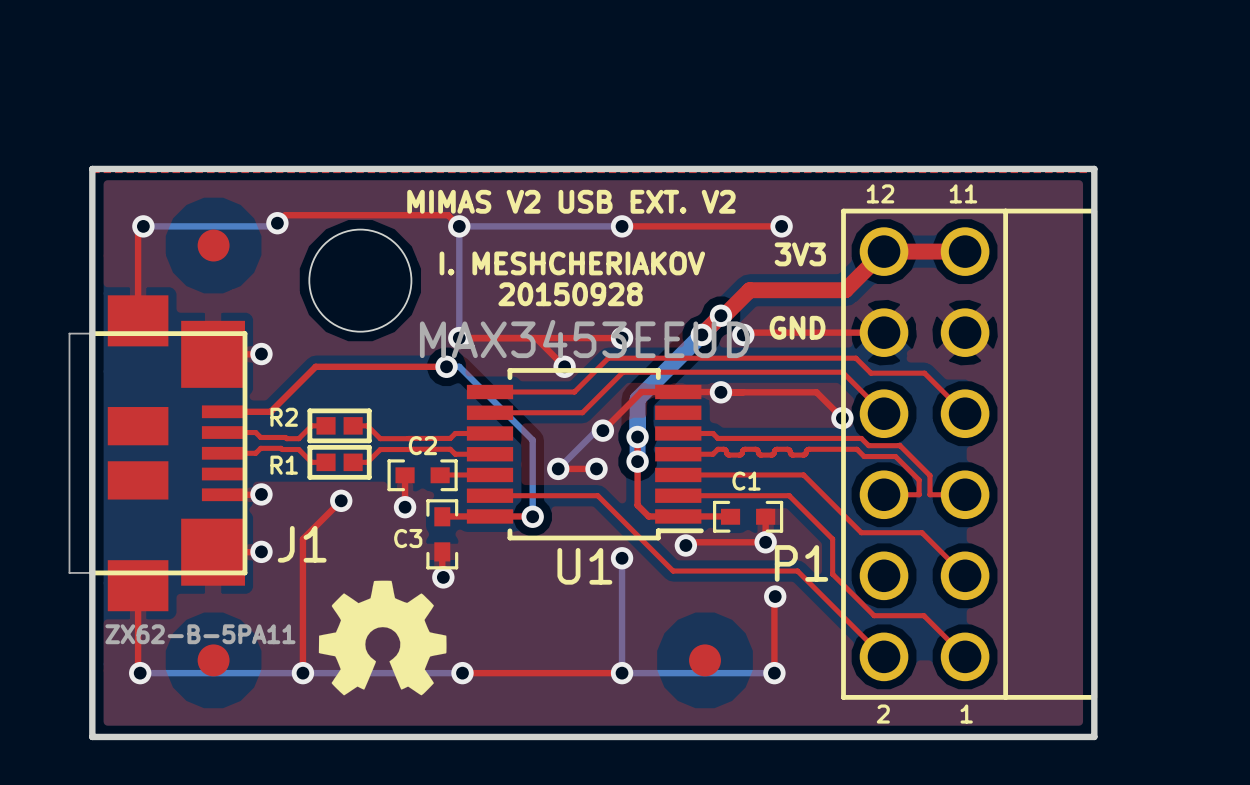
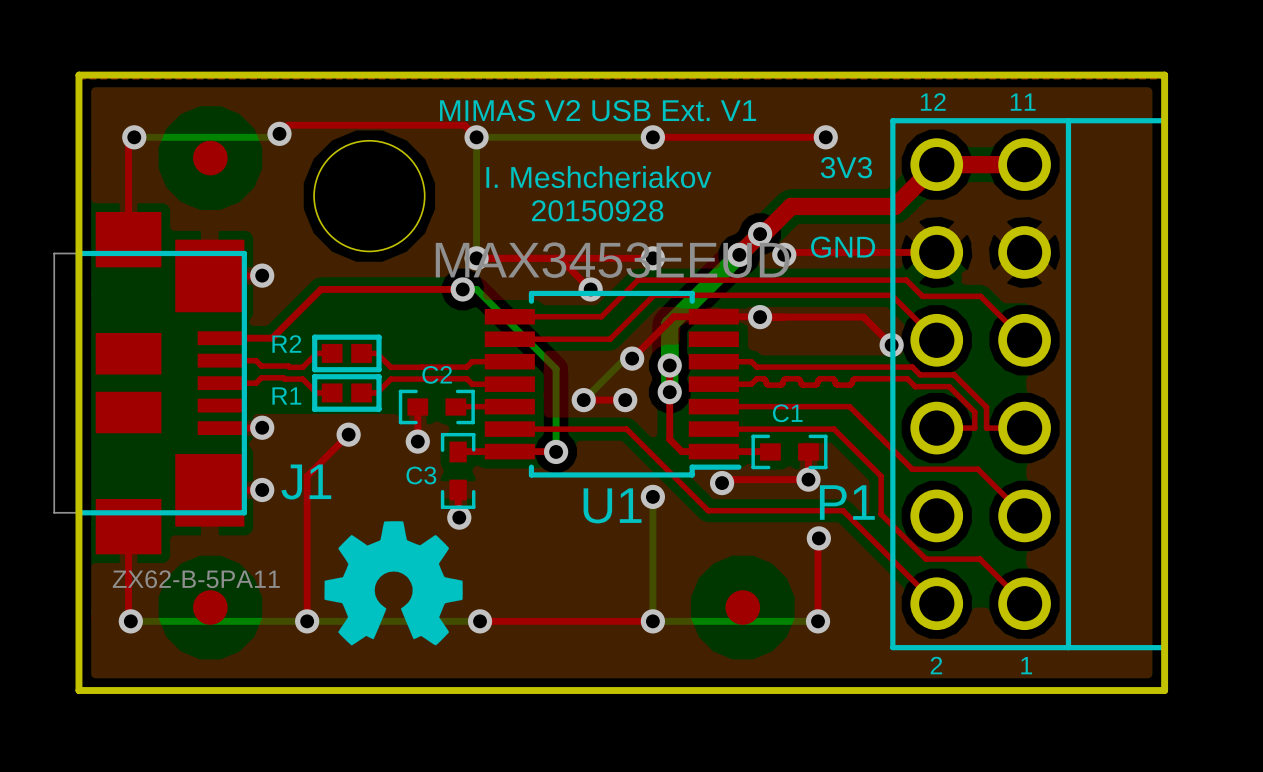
text: MIMAS V2 USB EXT. V2 (571, 201) -> MIMAS V2 USB Ext. V1 (598, 110)
text: I. MESHCHERIAKOV (572, 263) -> I. Meshcheriakov (598, 177)

